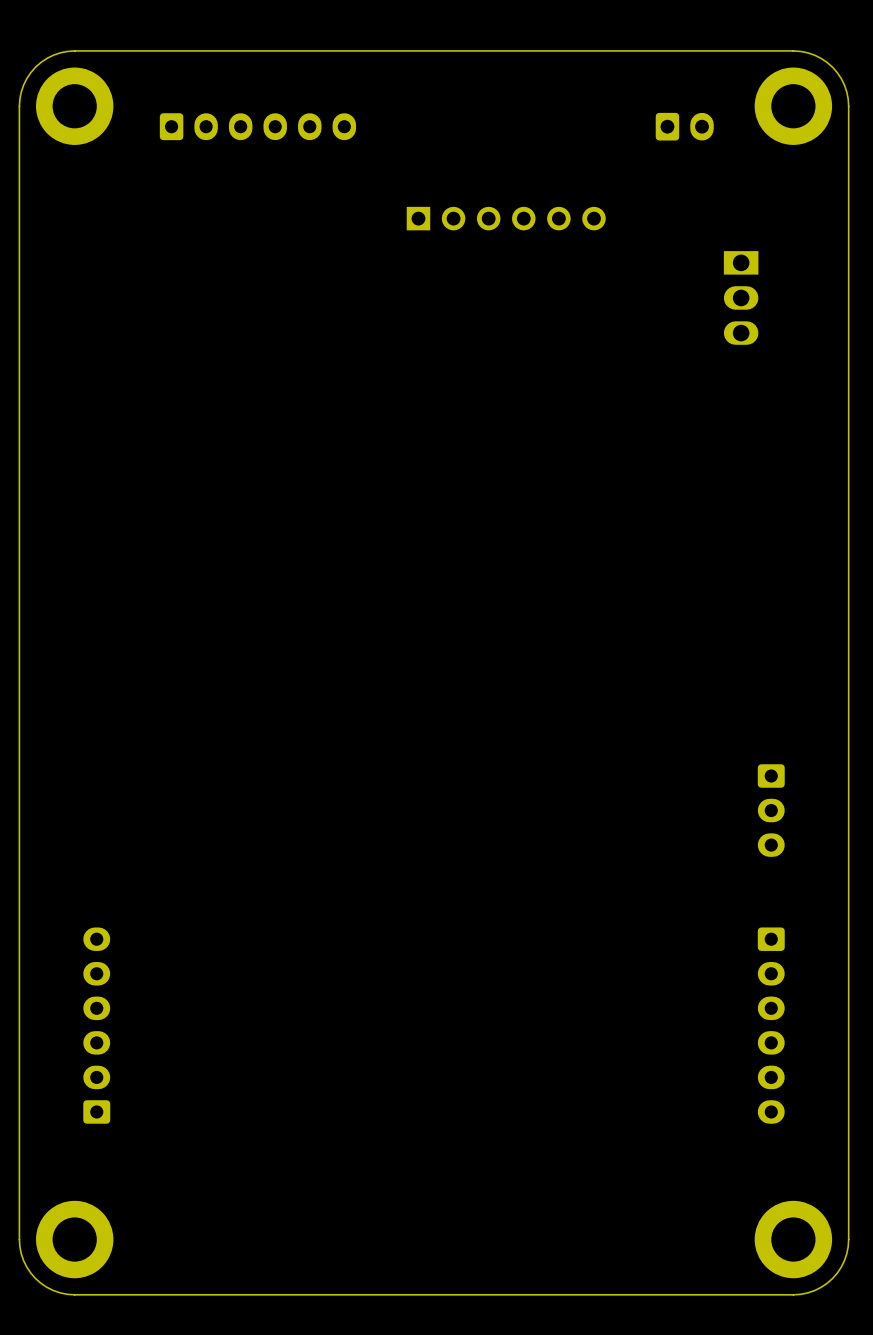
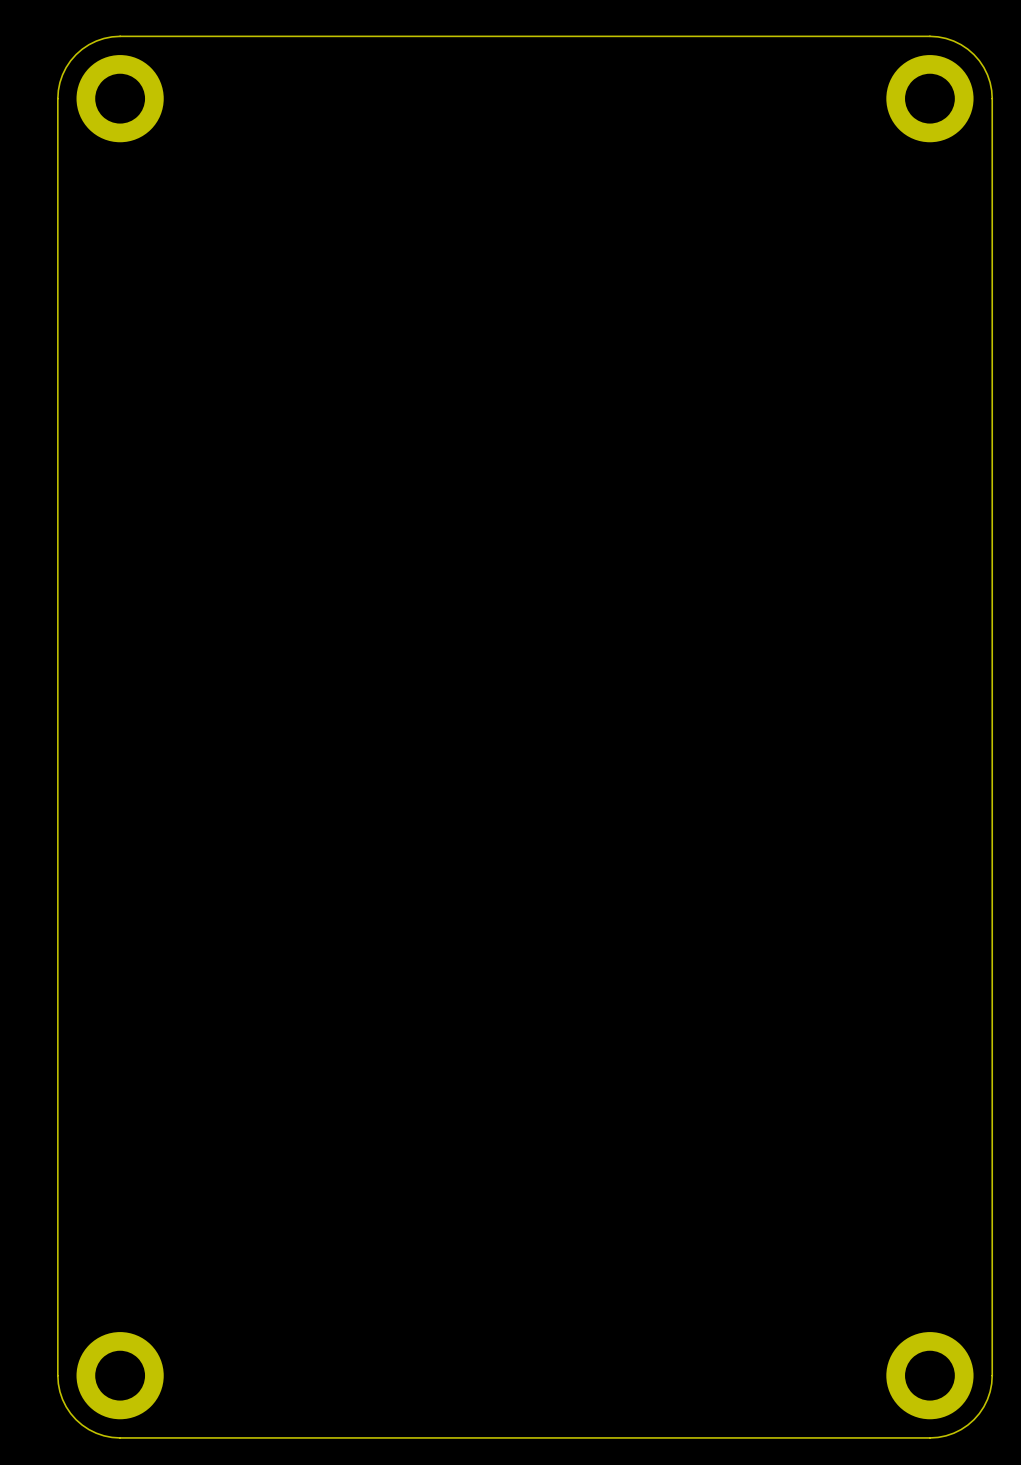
part: (257, 126) -> none
part: (684, 126) -> none
part: (506, 218) -> none
part: (741, 297) -> none
part: (771, 810) -> none
part: (96, 1025) -> none
part: (771, 1025) -> none

